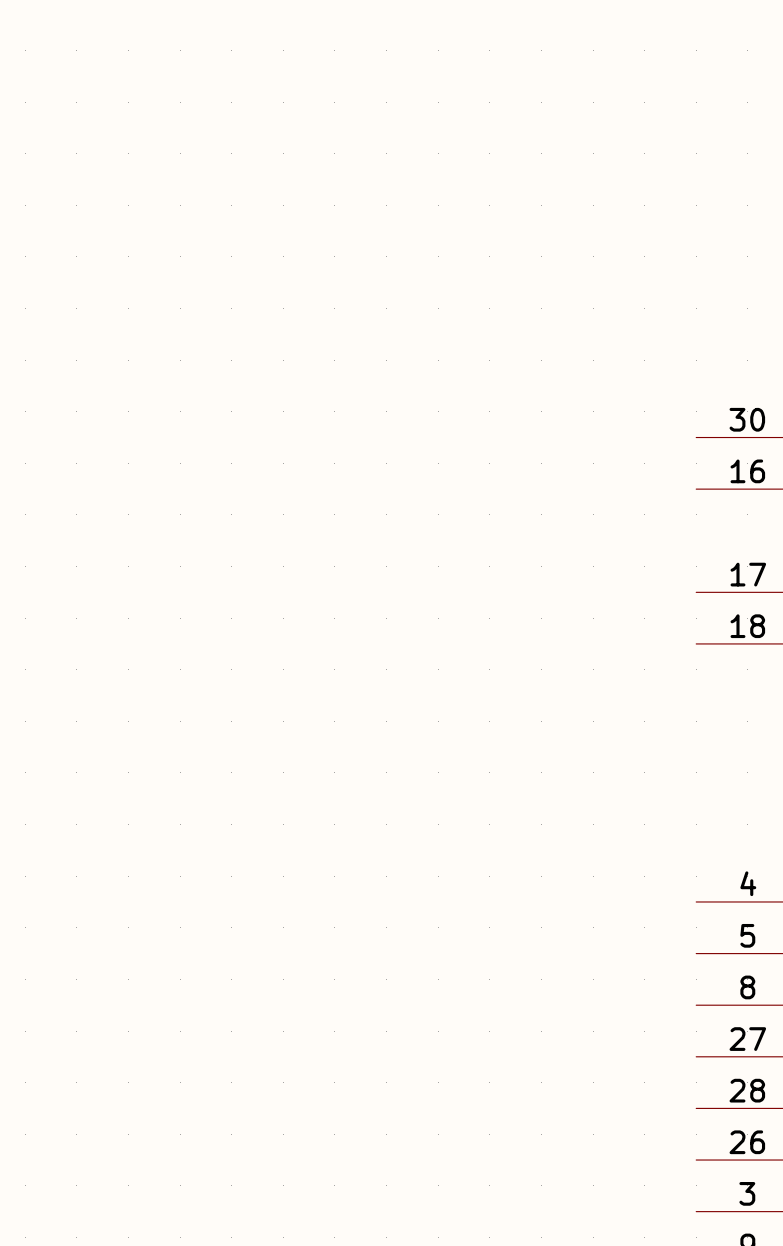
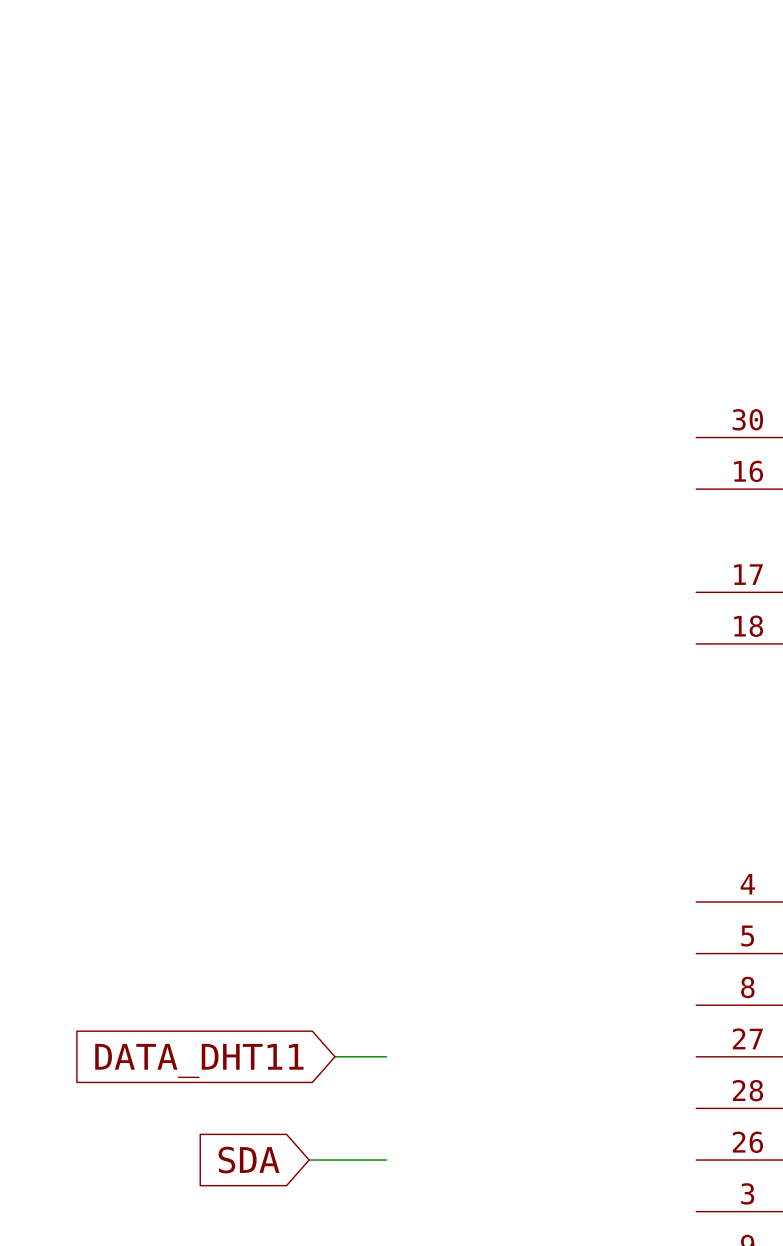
wire: none -> (334, 1056) (386, 1056)
global label: none -> DATA_DHT11 (199, 1060)
global label: none -> SDA (249, 1160)
wire: none -> (309, 1160) (386, 1160)

